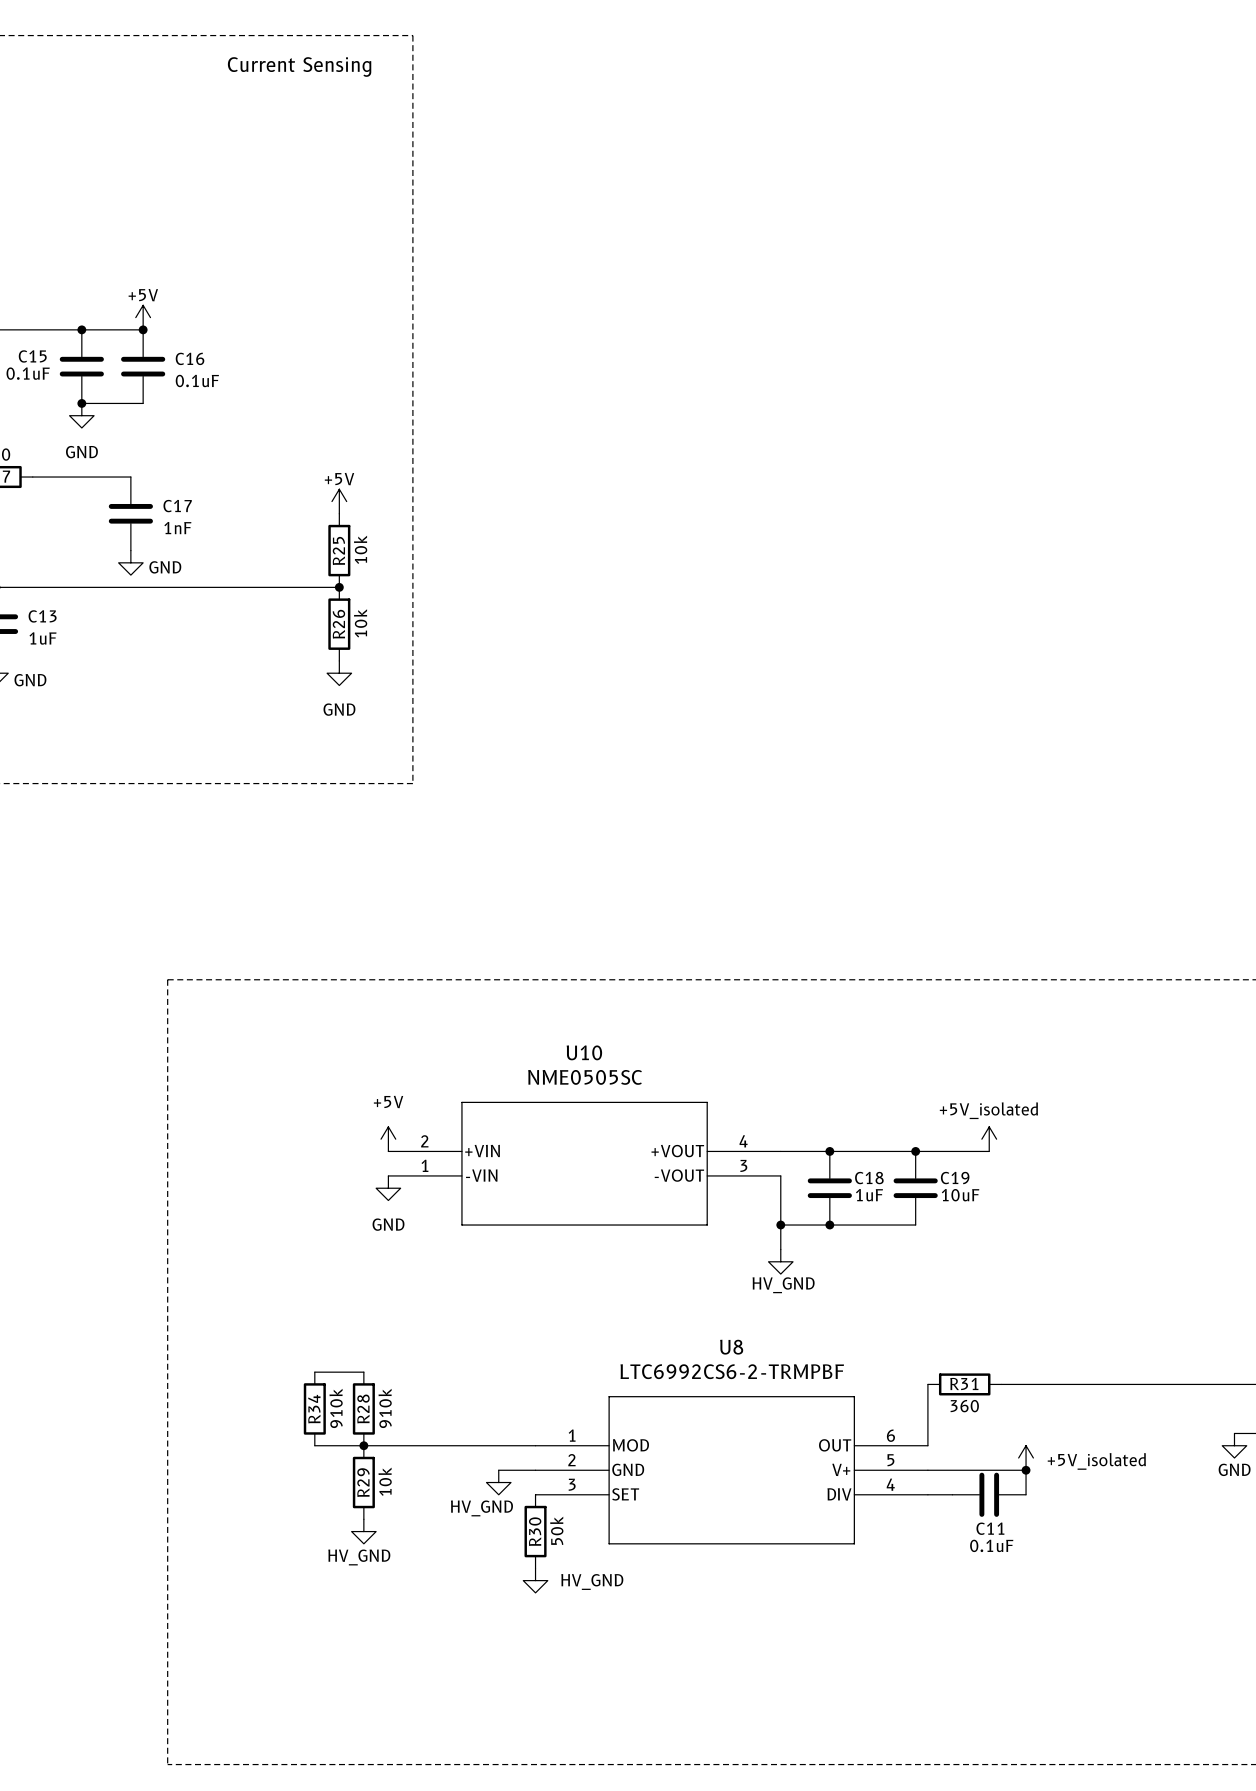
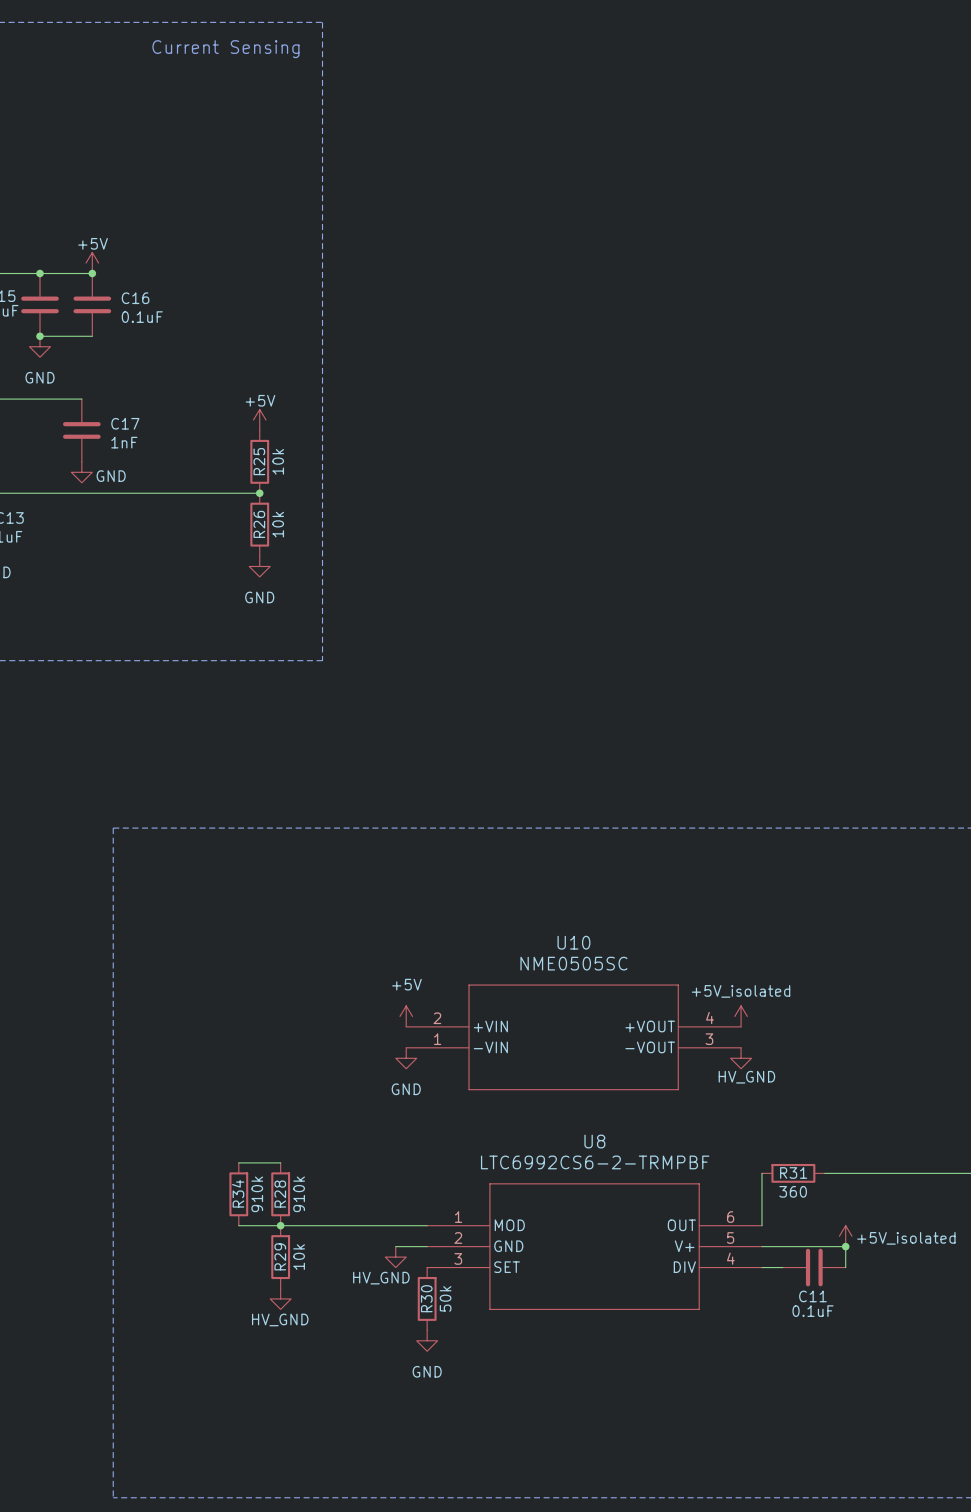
power symbol position: +5V (388, 1139) -> +5V (406, 1016)
power symbol position: +5V_isolated (989, 1139) -> +5V_isolated (741, 1016)
wire: (780, 1151) (989, 1151) -> none
junction: (829, 1151) -> none
junction: (915, 1151) -> none
U10 position: (584, 1163) -> (573, 1037)
wire: (780, 1175) (780, 1249) -> none
power symbol position: GND (388, 1188) -> GND (406, 1058)
C18: 1uF (829, 1188) -> none
C19: 10uF (915, 1188) -> none
wire: (780, 1225) (915, 1225) -> none
junction: (780, 1225) -> none
junction: (829, 1225) -> none
power symbol position: HV_GND (780, 1261) -> HV_GND (741, 1058)
power symbol: HV_GND (535, 1580) -> GND (427, 1340)

